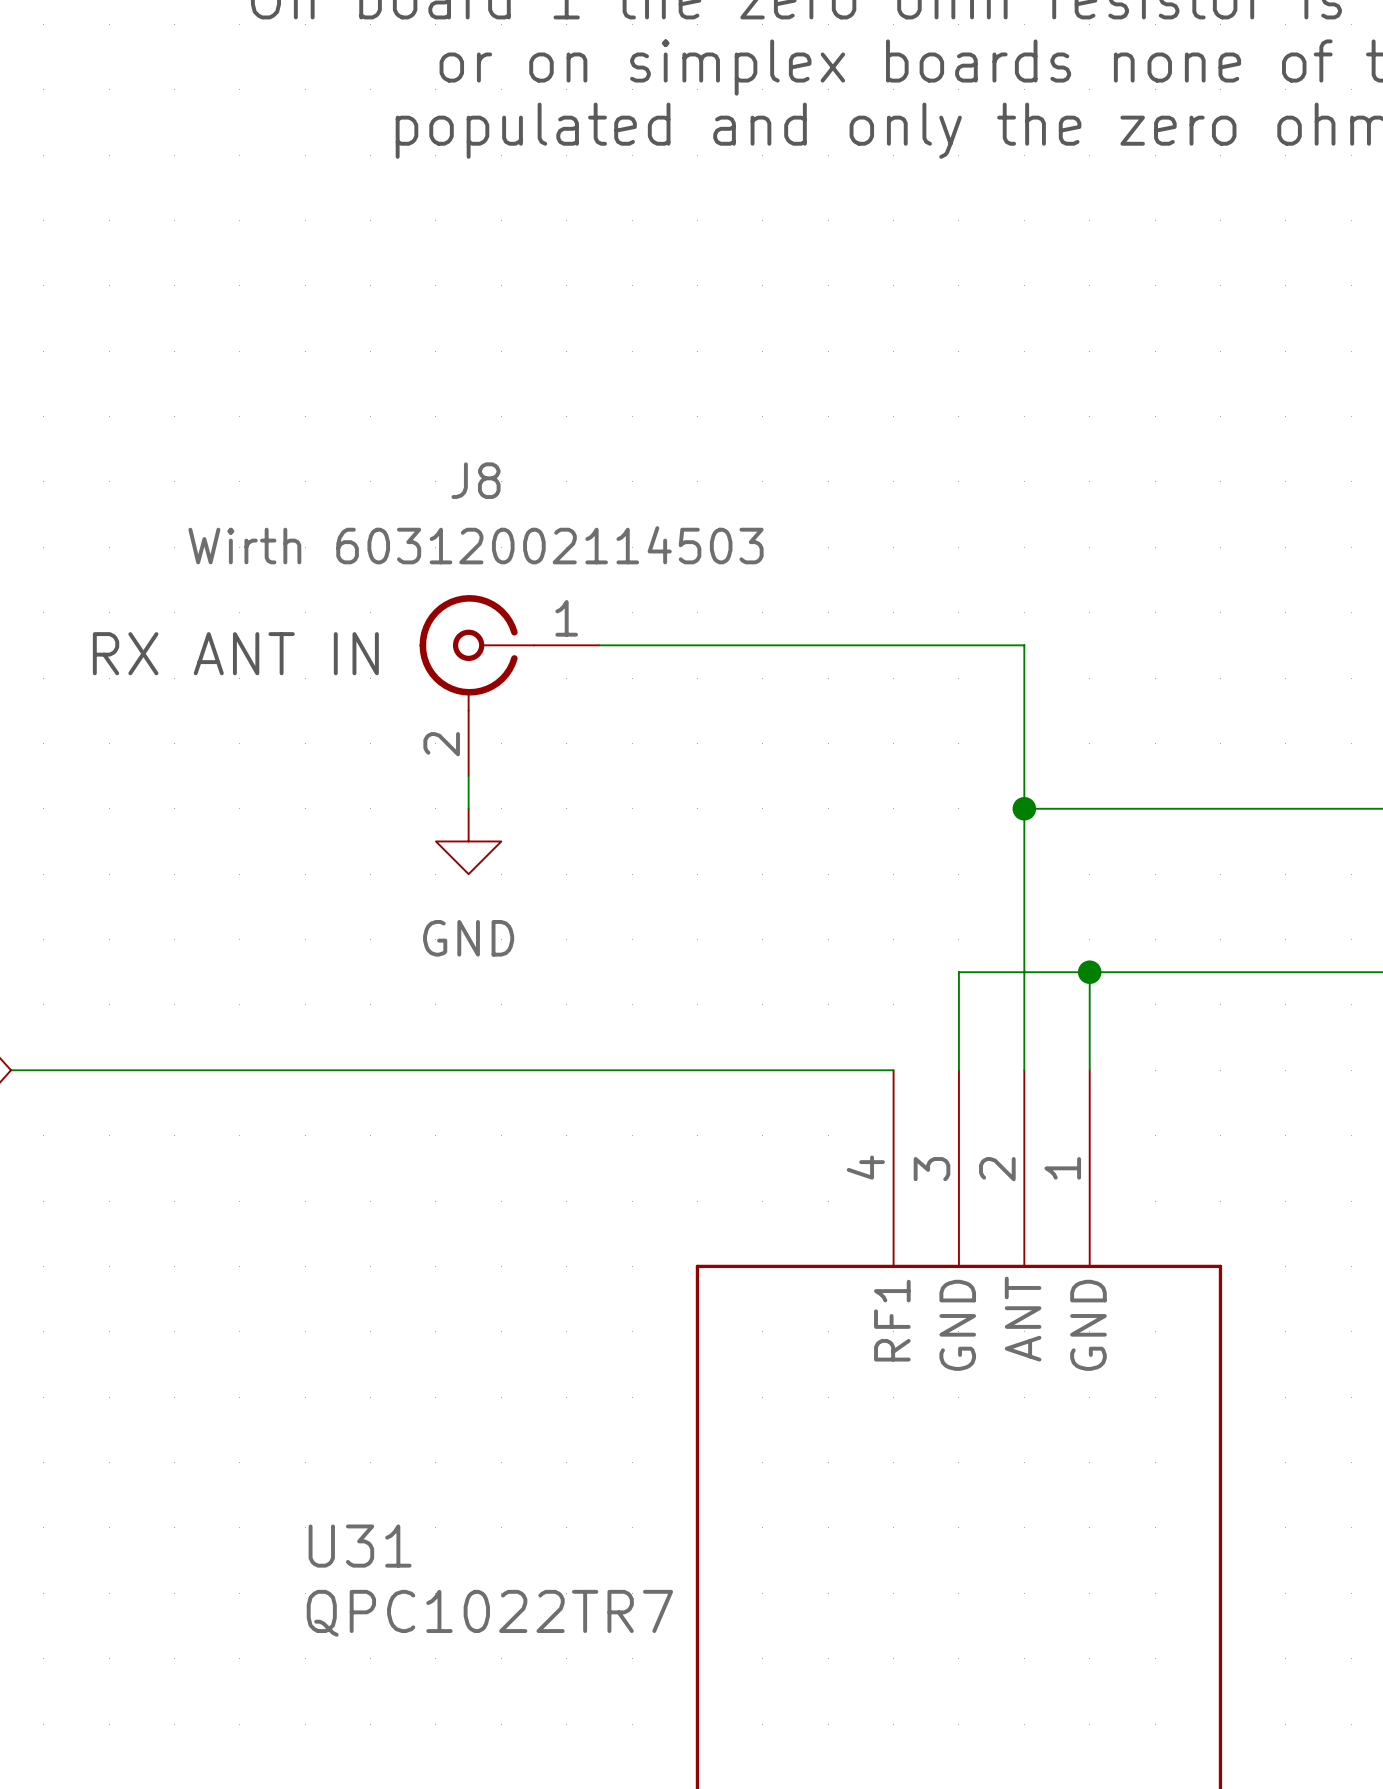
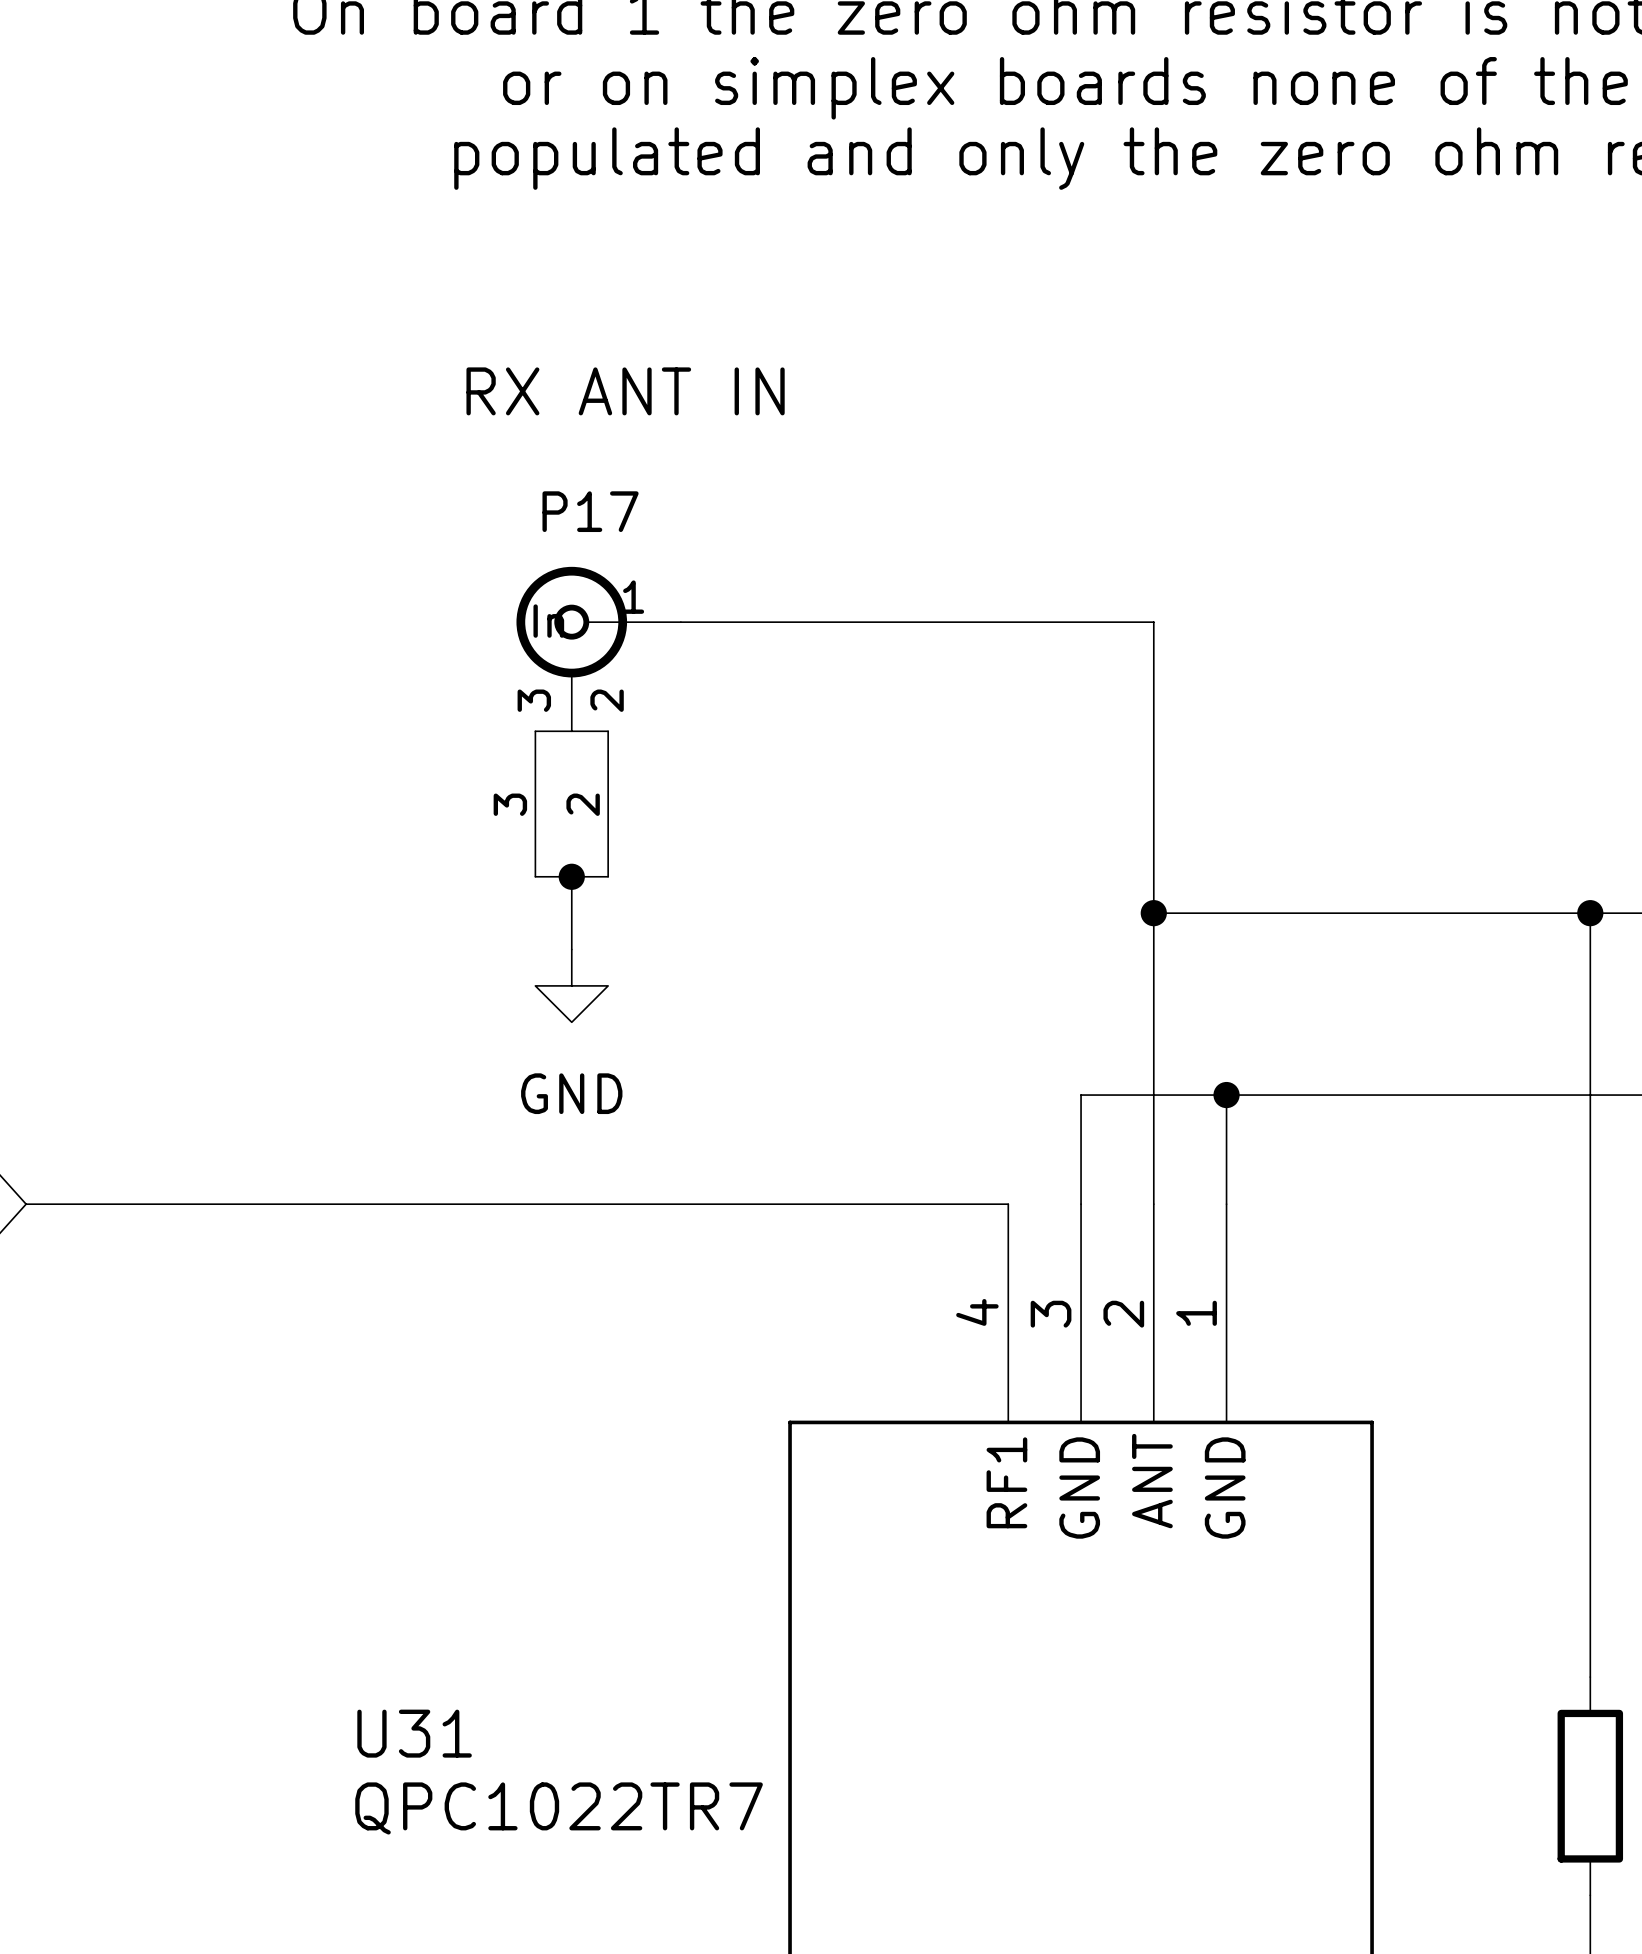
P17: none -> (598, 721)
wire: (599, 645) (1024, 645) -> (680, 622) (1153, 622) (1153, 731)
text position: RX ANT IN (235, 653) -> RX ANT IN (625, 391)
J8: Wirth 60312002114503 (509, 685) -> none
wire: (468, 776) (468, 808) -> (535, 876) (608, 876)
wire: none -> (571, 876) (571, 949)
junction: none -> (571, 876)
power symbol position: GND (468, 841) -> GND (571, 985)

